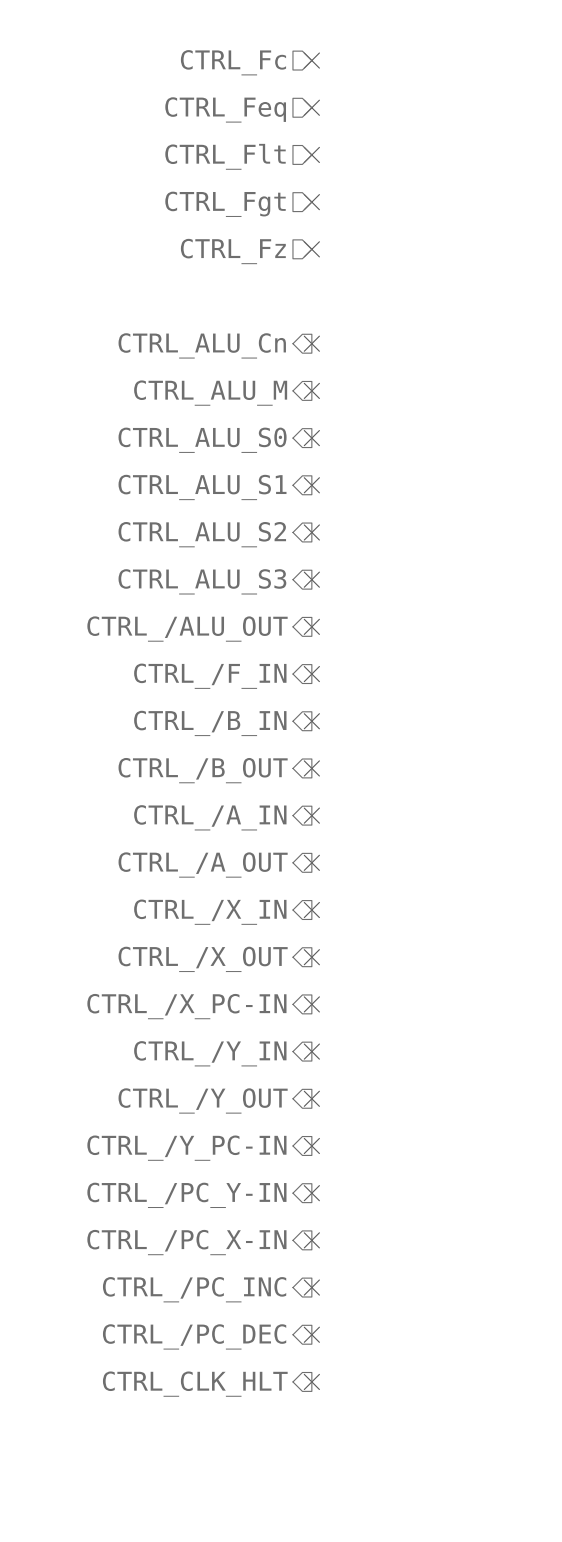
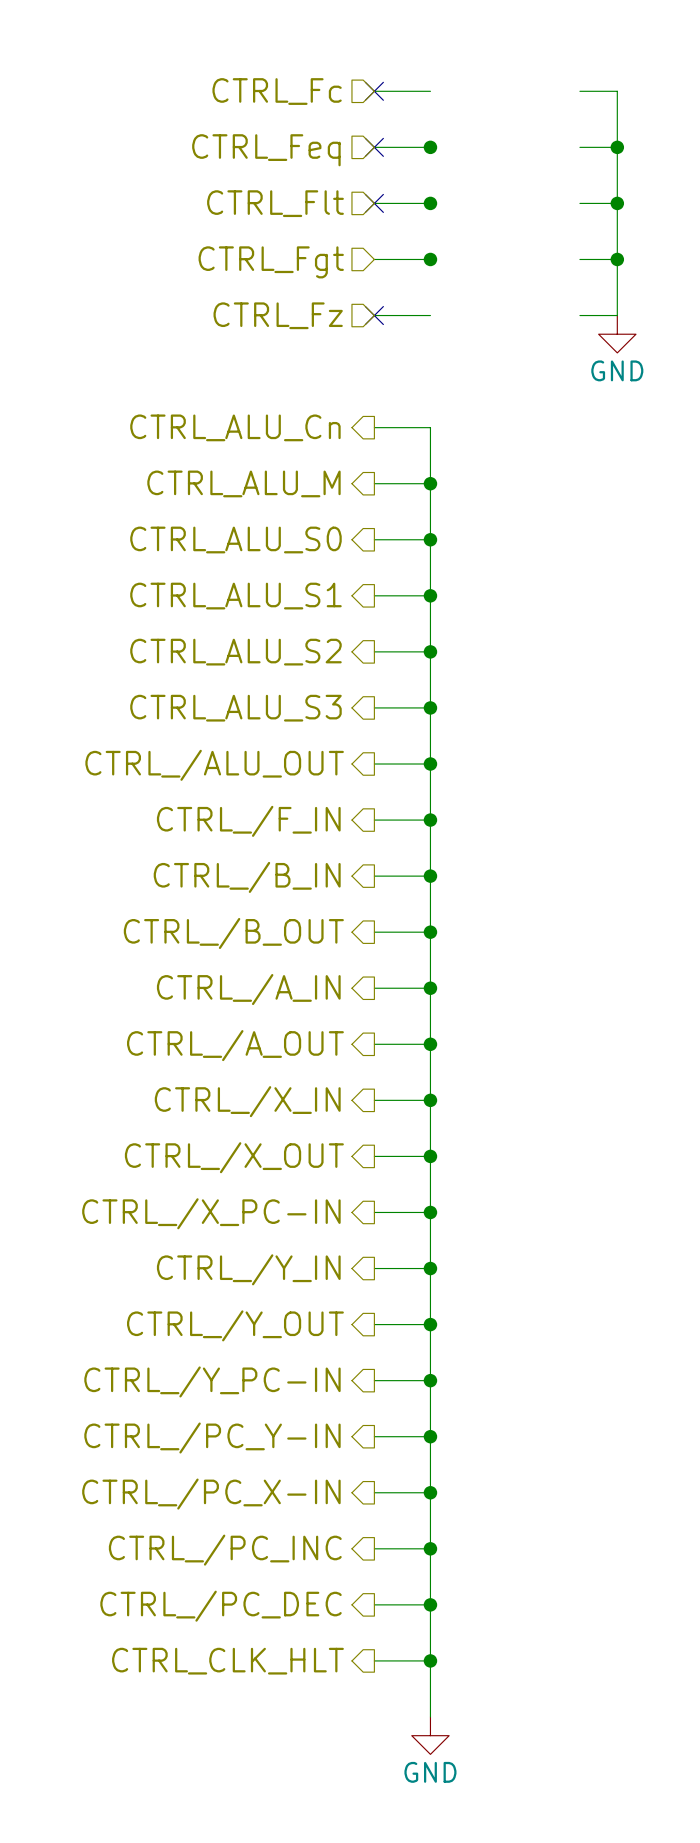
wire: none -> (374, 91) (430, 91)
wire: none -> (579, 91) (617, 91) (617, 315) (579, 315)
wire: none -> (374, 147) (430, 147)
junction: none -> (430, 147)
wire: none -> (579, 147) (617, 147)
junction: none -> (617, 147)
wire: none -> (374, 203) (430, 203)
junction: none -> (430, 203)
wire: none -> (579, 203) (617, 203)
junction: none -> (617, 203)
wire: none -> (374, 259) (430, 259)
no-connect mark: (311, 202) -> none
junction: none -> (430, 259)
wire: none -> (579, 259) (617, 259)
junction: none -> (617, 259)
wire: none -> (374, 315) (430, 315)
power symbol: none -> GND (617, 334)
wire: none -> (374, 427) (430, 427) (430, 1717)
no-connect mark: (311, 343) -> none
wire: none -> (374, 483) (430, 483)
no-connect mark: (311, 390) -> none
junction: none -> (430, 483)
wire: none -> (374, 539) (430, 539)
no-connect mark: (311, 438) -> none
junction: none -> (430, 539)
wire: none -> (374, 595) (430, 595)
no-connect mark: (311, 485) -> none
junction: none -> (430, 595)
wire: none -> (374, 651) (430, 651)
no-connect mark: (311, 532) -> none
junction: none -> (430, 651)
wire: none -> (374, 707) (430, 707)
no-connect mark: (311, 579) -> none
junction: none -> (430, 707)
wire: none -> (374, 764) (430, 764)
no-connect mark: (311, 626) -> none
junction: none -> (430, 764)
wire: none -> (374, 820) (430, 820)
no-connect mark: (311, 674) -> none
junction: none -> (430, 820)
wire: none -> (374, 876) (430, 876)
no-connect mark: (311, 721) -> none
junction: none -> (430, 876)
wire: none -> (374, 932) (430, 932)
no-connect mark: (311, 768) -> none
junction: none -> (430, 932)
wire: none -> (374, 988) (430, 988)
no-connect mark: (311, 815) -> none
junction: none -> (430, 988)
wire: none -> (374, 1044) (430, 1044)
no-connect mark: (311, 862) -> none
junction: none -> (430, 1044)
wire: none -> (374, 1100) (430, 1100)
no-connect mark: (311, 910) -> none
junction: none -> (430, 1100)
wire: none -> (374, 1156) (430, 1156)
no-connect mark: (311, 957) -> none
junction: none -> (430, 1156)
wire: none -> (374, 1212) (430, 1212)
no-connect mark: (311, 1004) -> none
junction: none -> (430, 1212)
wire: none -> (374, 1268) (430, 1268)
no-connect mark: (311, 1051) -> none
junction: none -> (430, 1268)
wire: none -> (374, 1324) (430, 1324)
no-connect mark: (311, 1098) -> none
junction: none -> (430, 1324)
wire: none -> (374, 1380) (430, 1380)
no-connect mark: (311, 1145) -> none
junction: none -> (430, 1380)
wire: none -> (374, 1436) (430, 1436)
no-connect mark: (311, 1193) -> none
junction: none -> (430, 1436)
wire: none -> (374, 1492) (430, 1492)
no-connect mark: (311, 1240) -> none
junction: none -> (430, 1492)
wire: none -> (374, 1548) (430, 1548)
no-connect mark: (311, 1287) -> none
junction: none -> (430, 1548)
wire: none -> (374, 1604) (430, 1604)
no-connect mark: (311, 1334) -> none
junction: none -> (430, 1604)
wire: none -> (374, 1660) (430, 1660)
no-connect mark: (311, 1381) -> none
junction: none -> (430, 1660)
power symbol: none -> GND (430, 1735)

